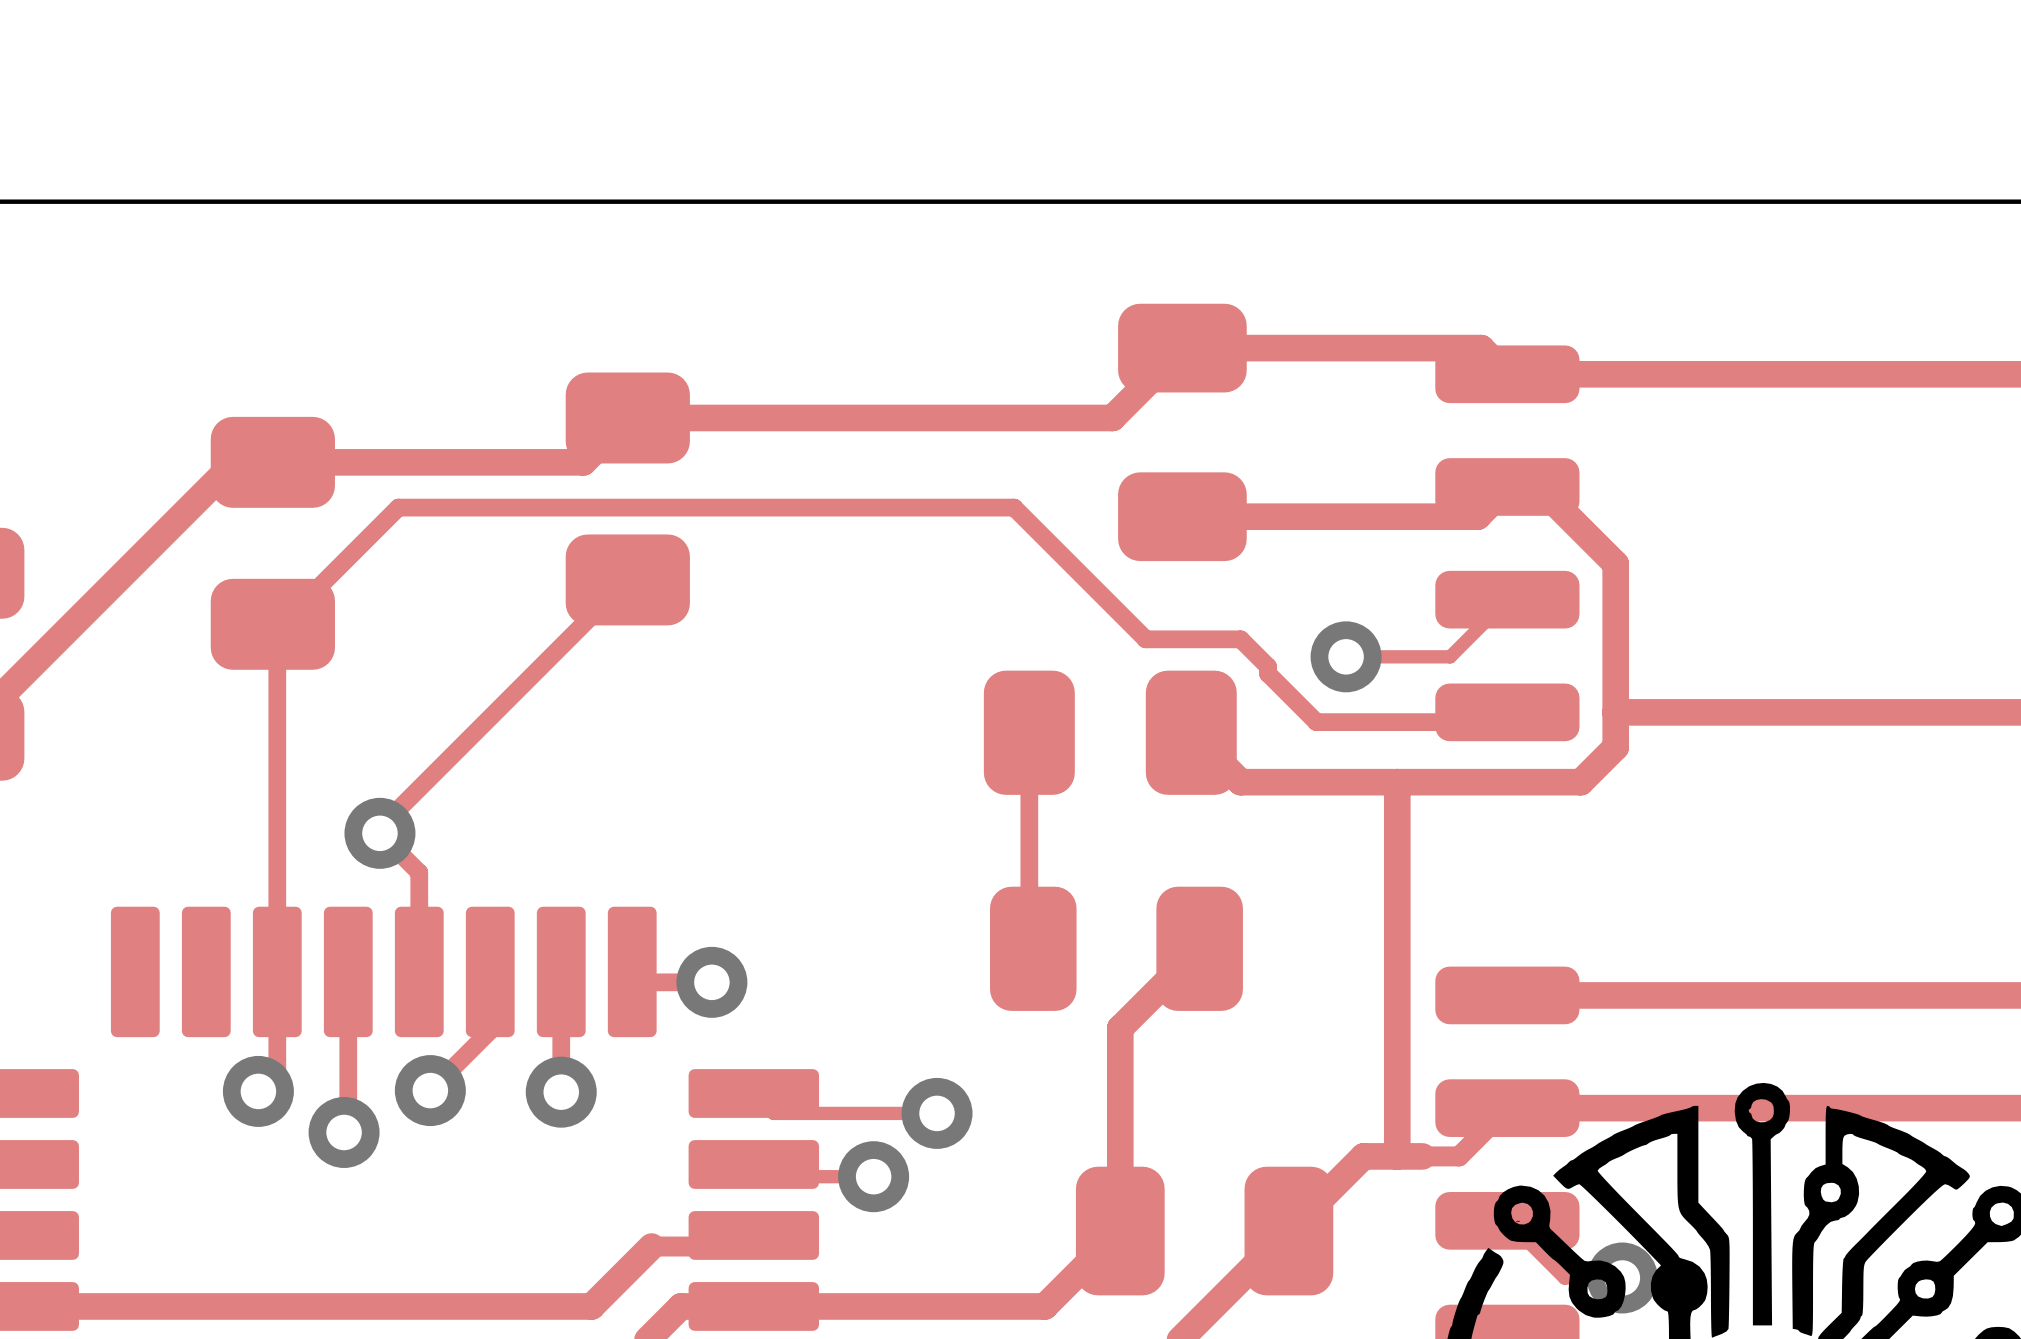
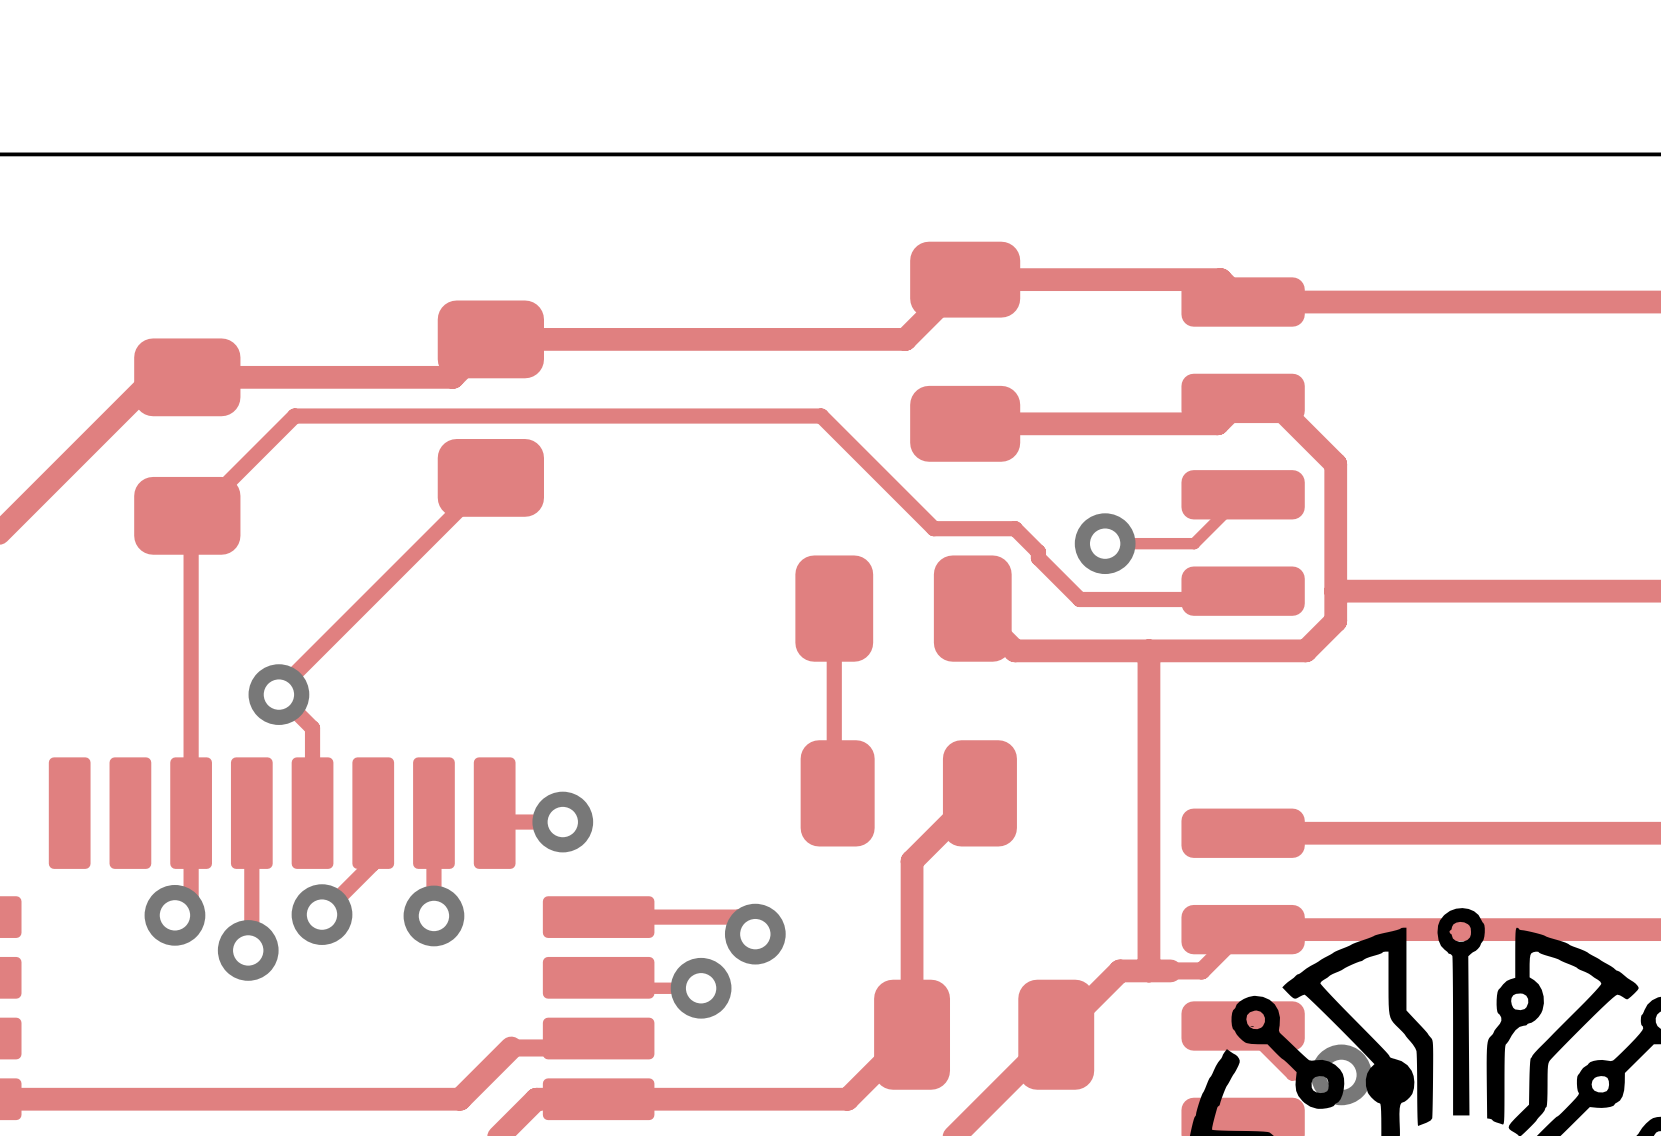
top track: (753, 1093) (773, 1113) (937, 1113) -> (598, 917) (738, 917) (755, 934)

